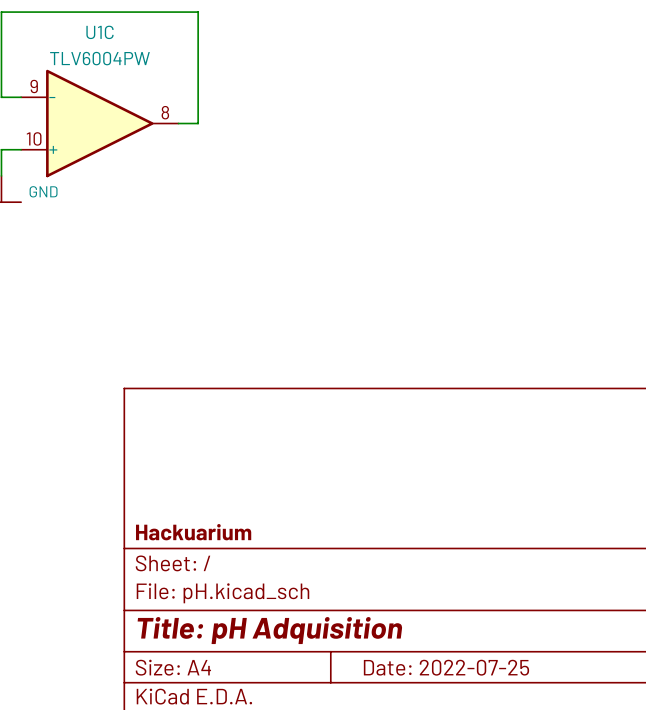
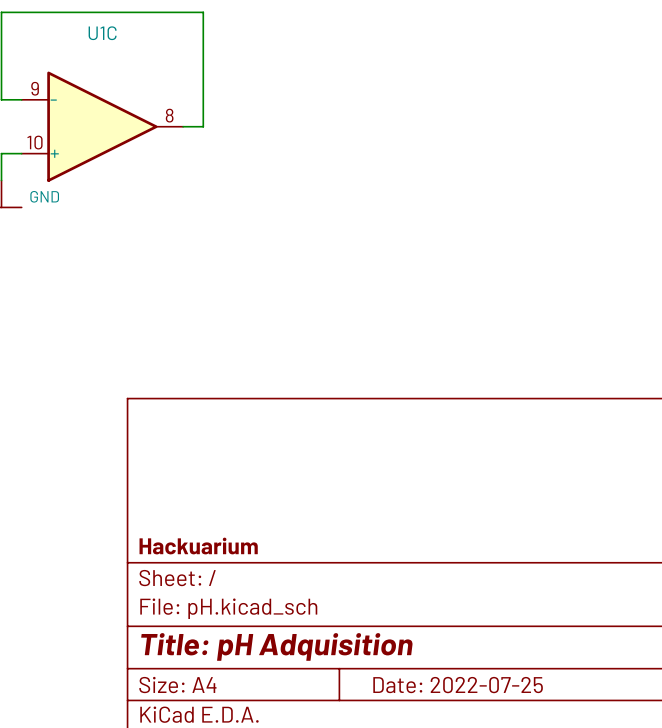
U1C value: TLV6004PW (99, 58) -> none

